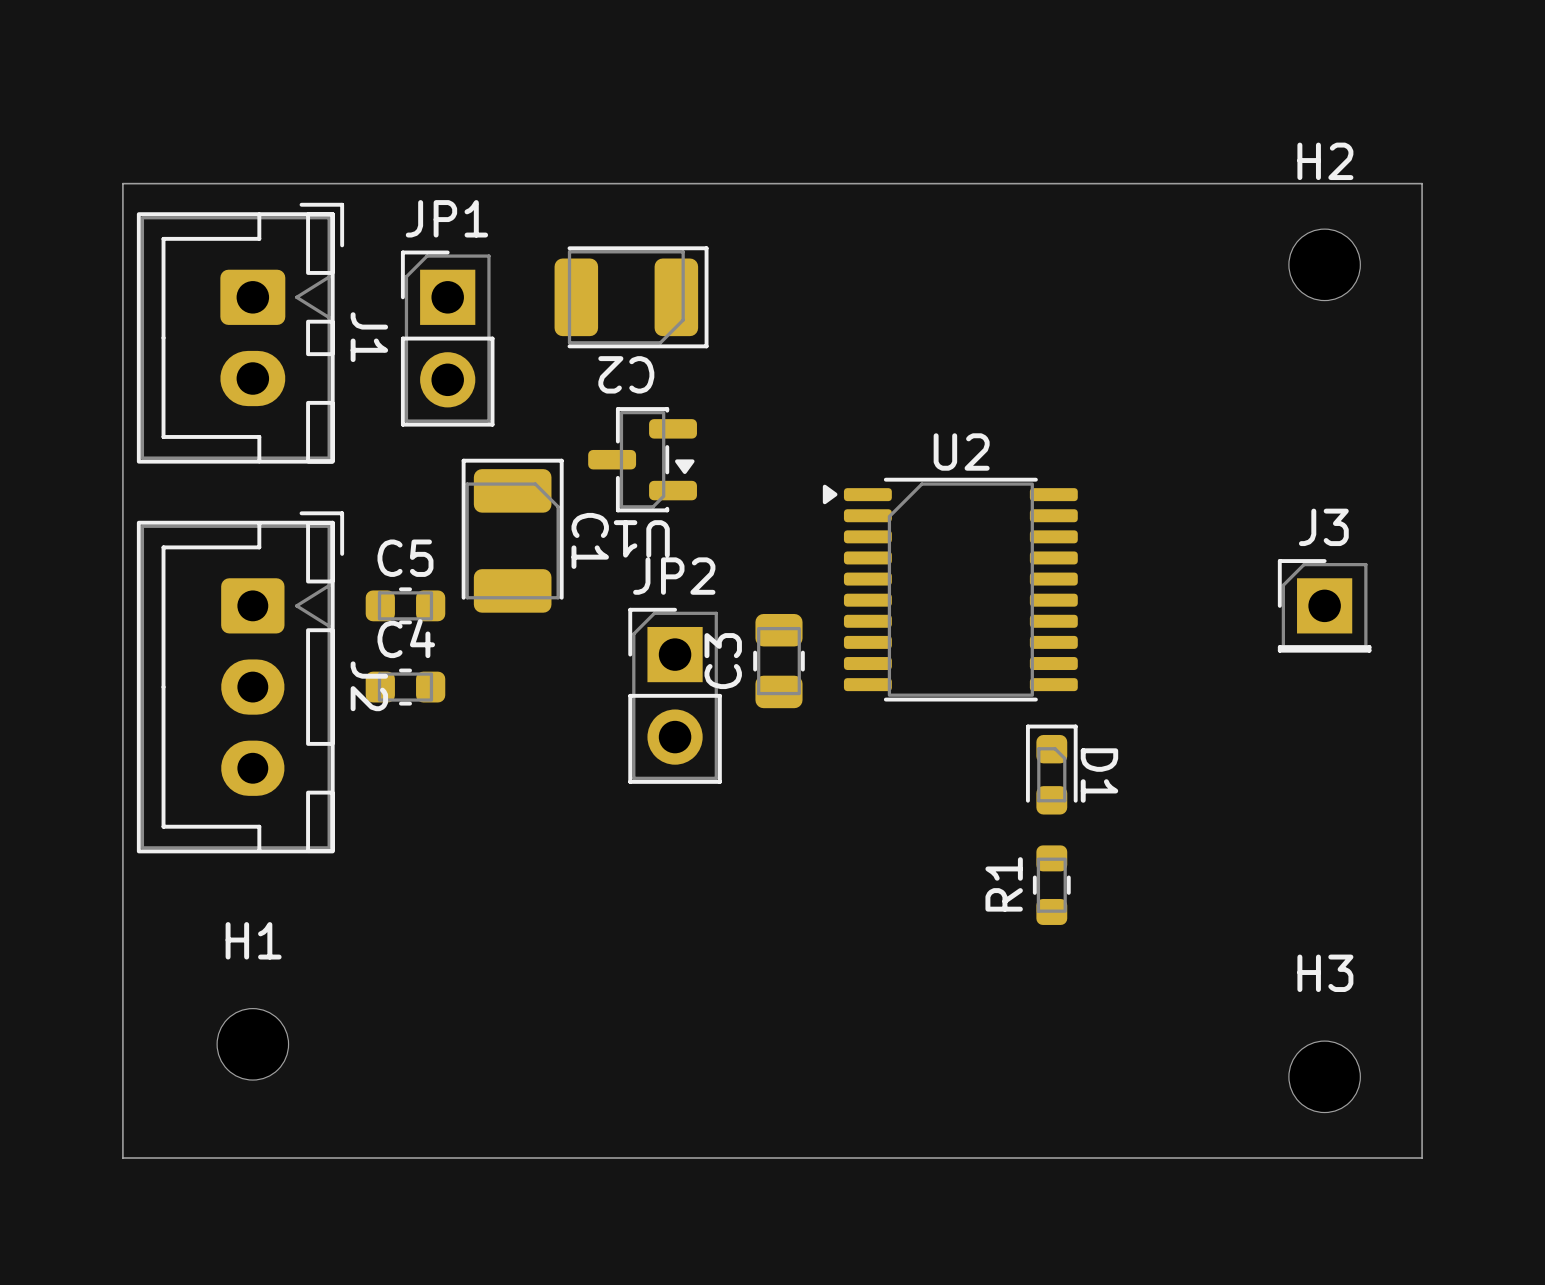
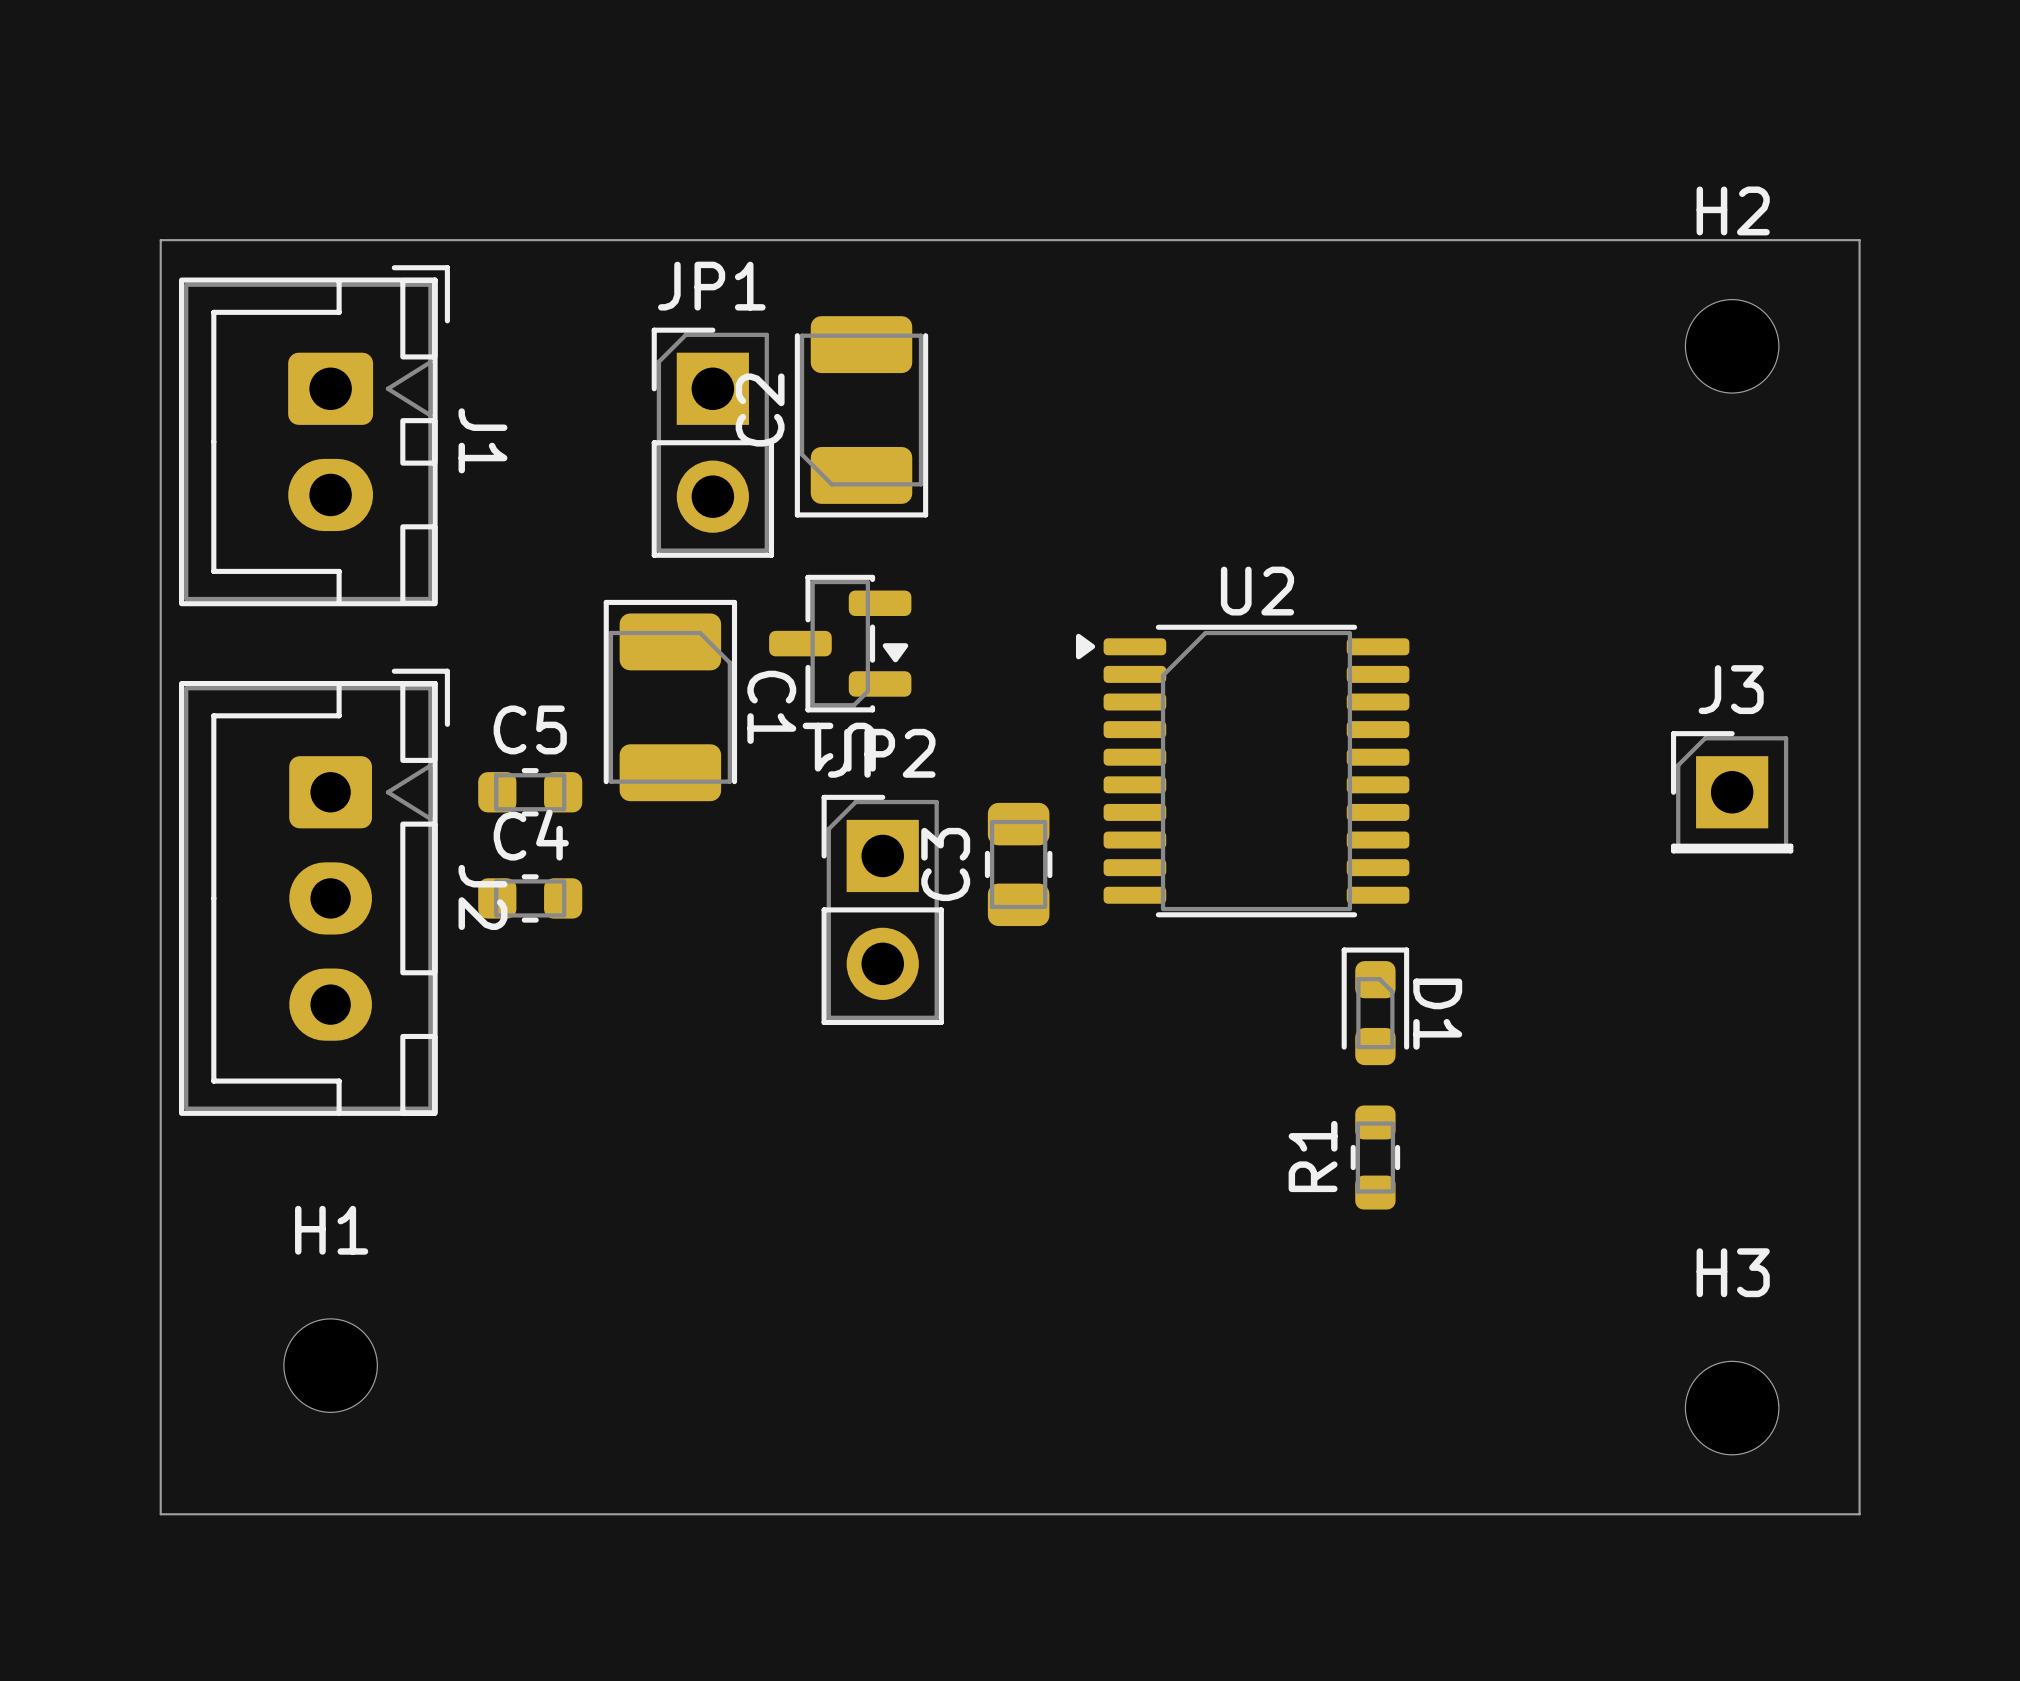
C2 rotation: 0° (631, 297) -> 90° clockwise (861, 416)
JP1 position: (447, 338) -> (712, 442)
U1 position: (642, 459) -> (840, 643)

